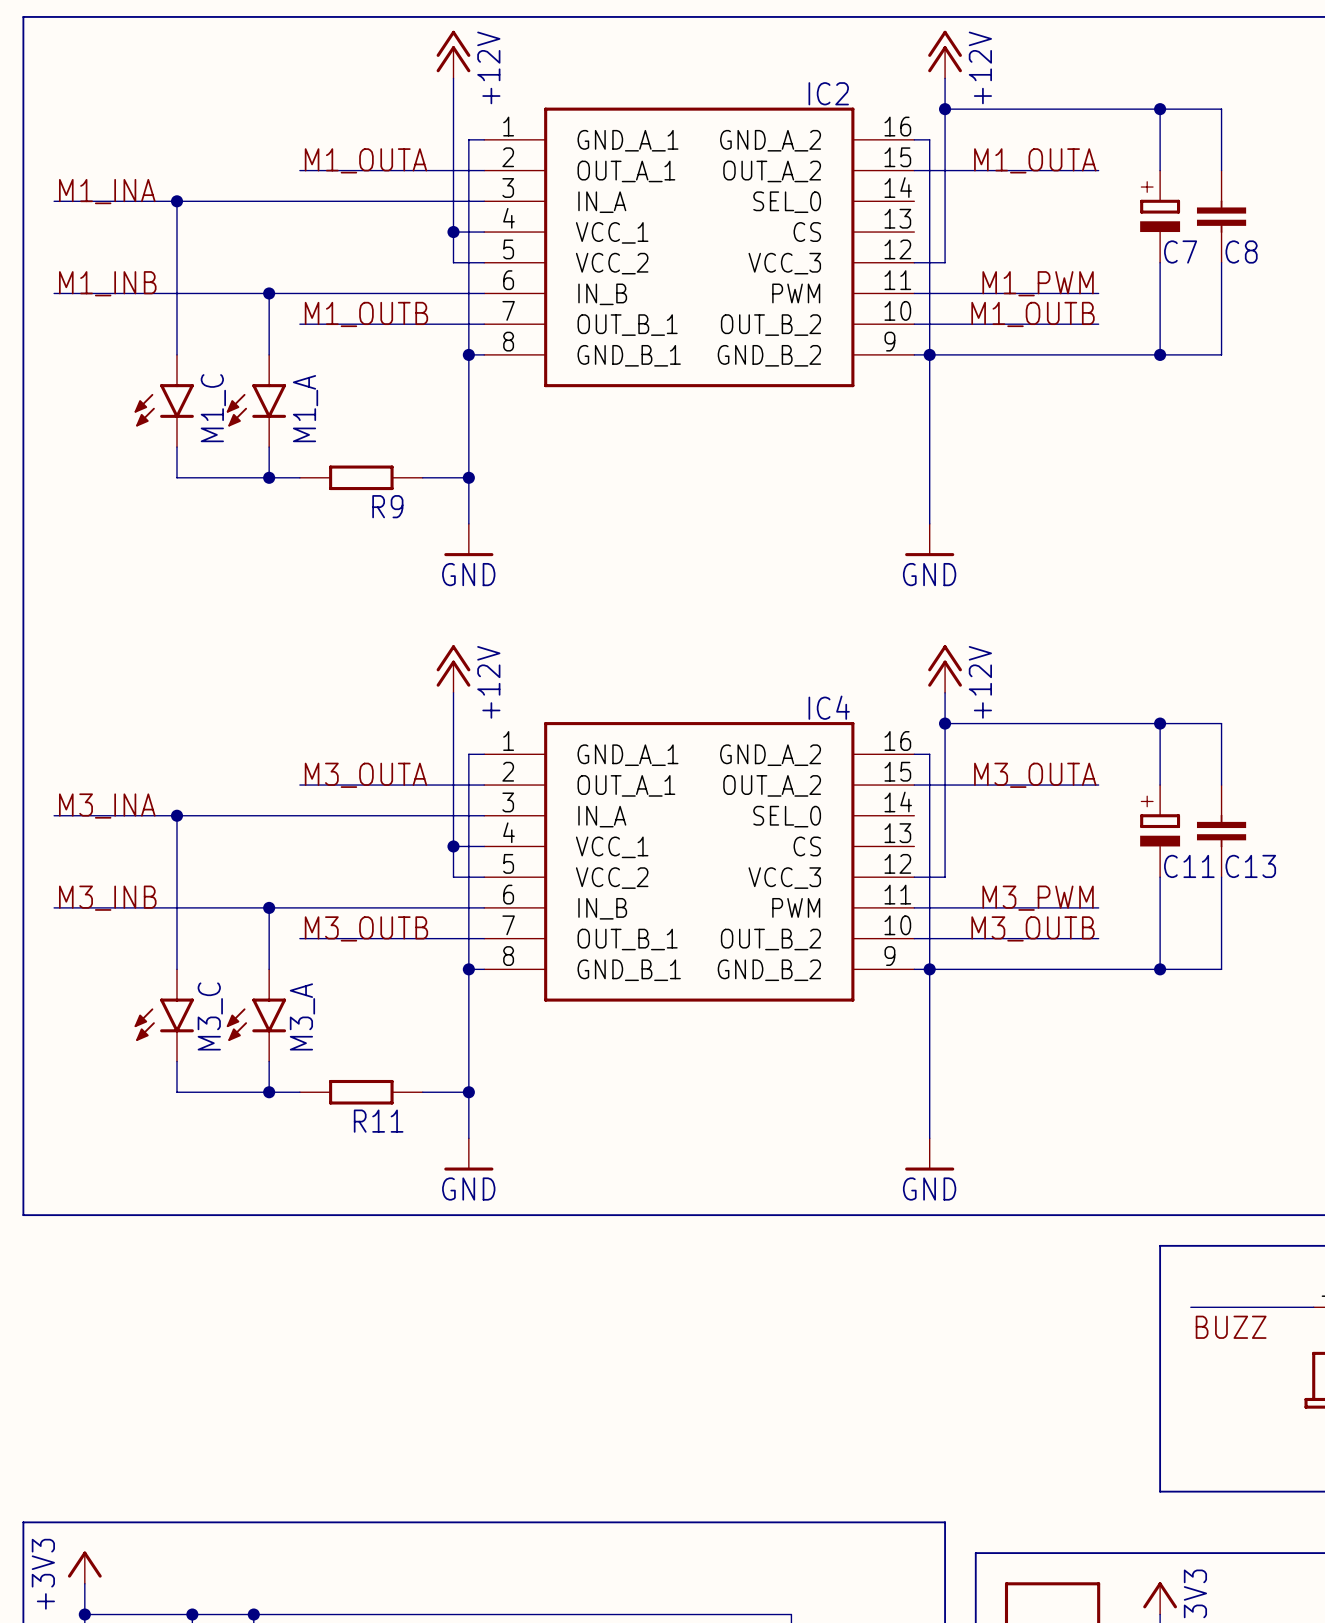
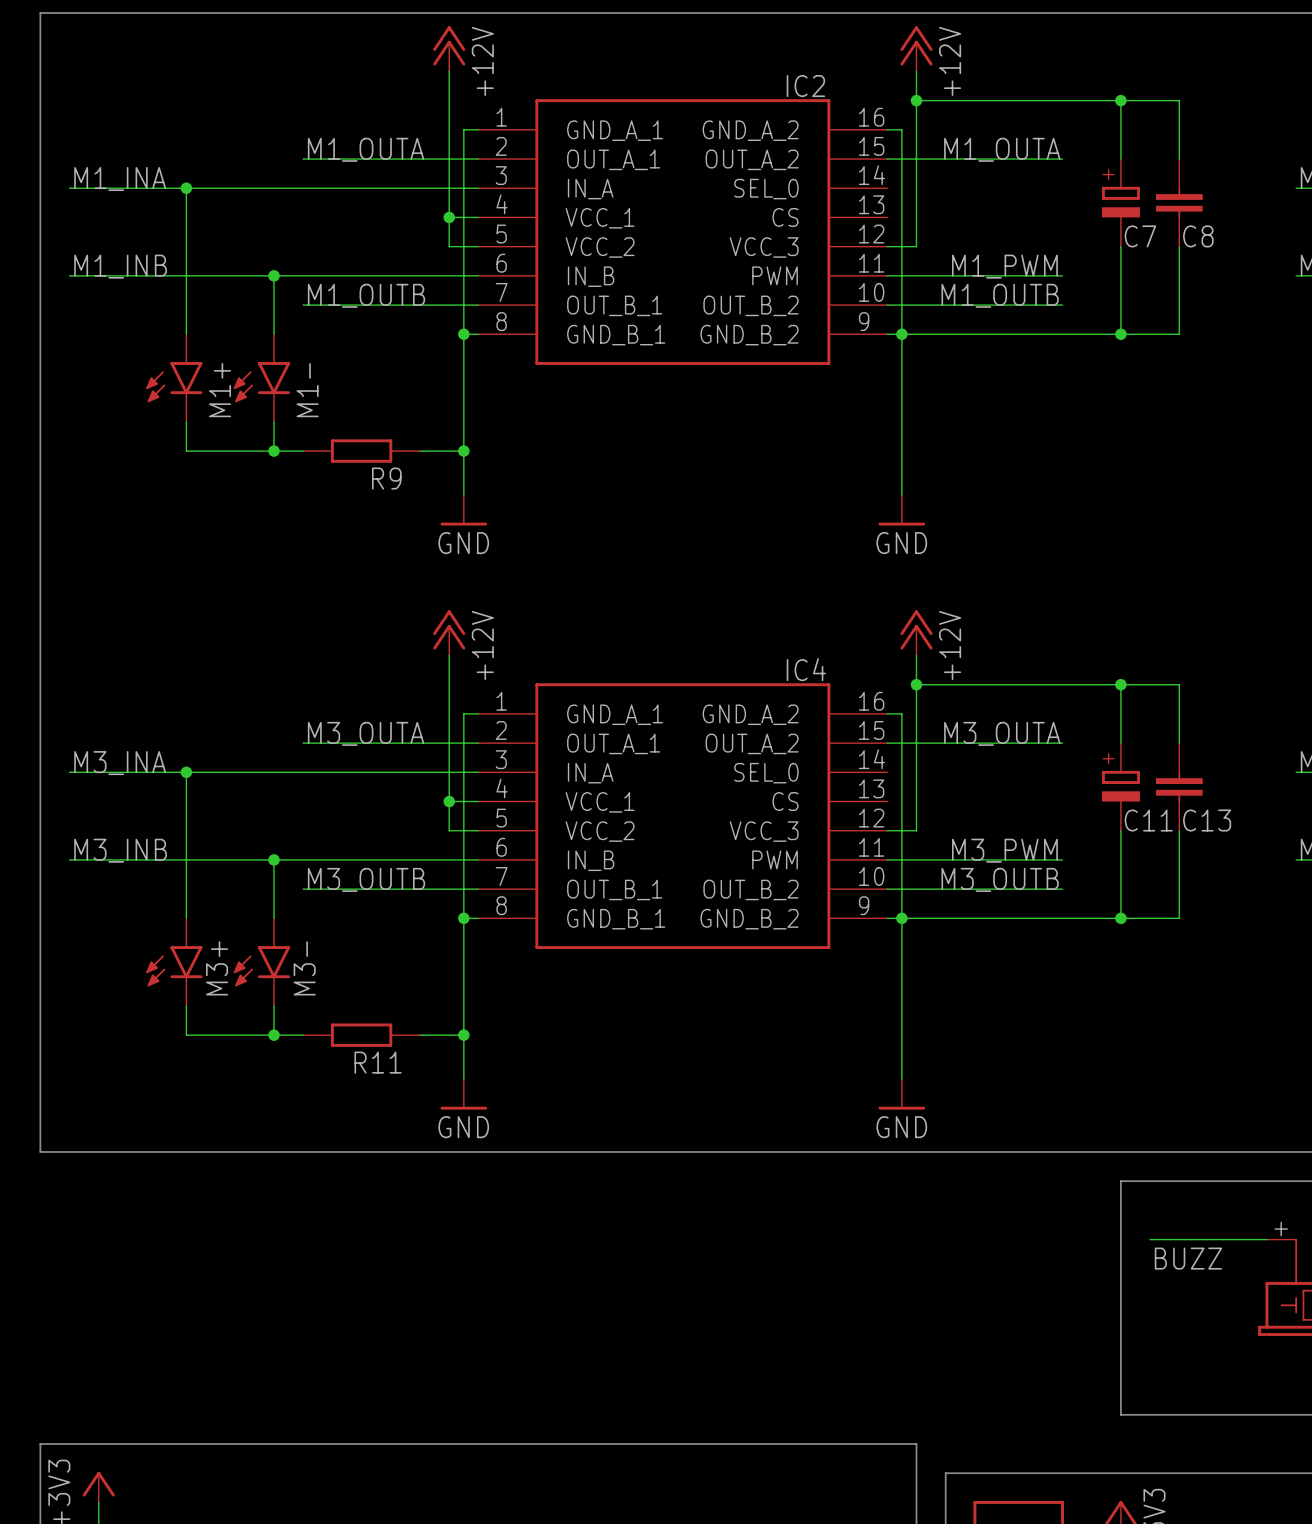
M1_C name: M1_C (213, 408) -> M1+ (219, 390)
M1_A name: M1_A (305, 408) -> M1- (307, 390)
M3_C name: M3_C (210, 1016) -> M3+ (217, 968)
M3_A name: M3_A (302, 1016) -> M3- (304, 968)

